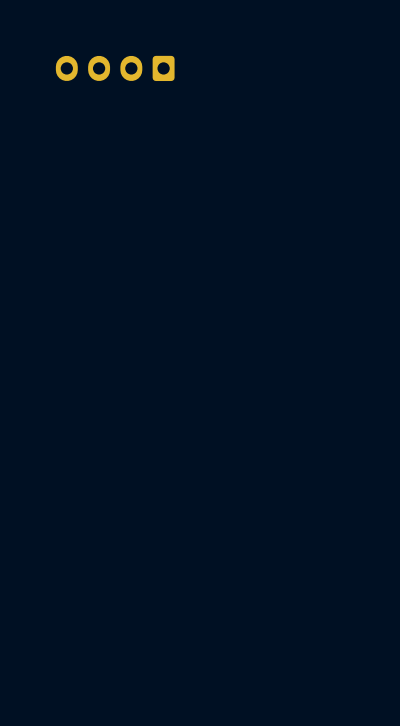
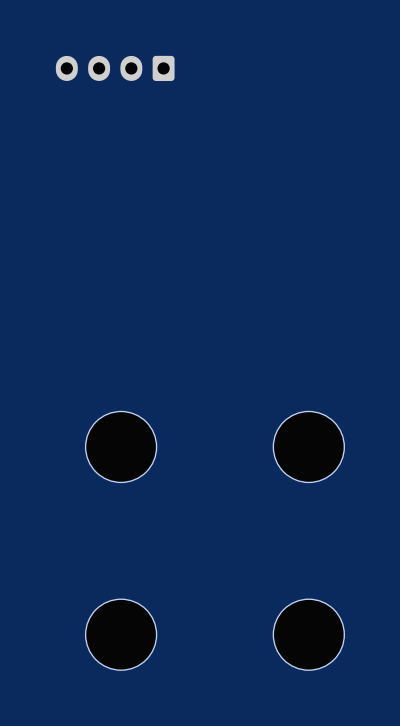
part: none -> (121, 446)
part: none -> (308, 446)
part: none -> (121, 634)
part: none -> (308, 634)

